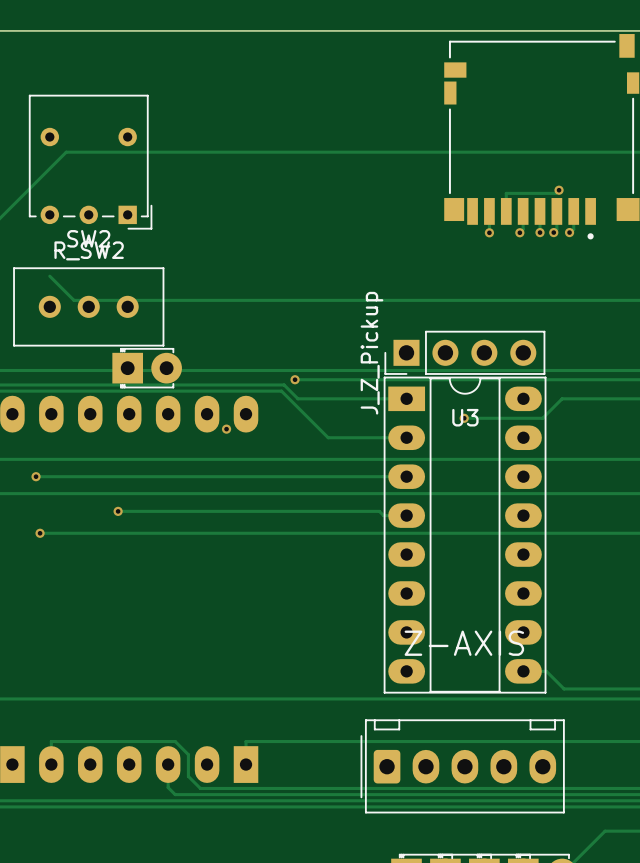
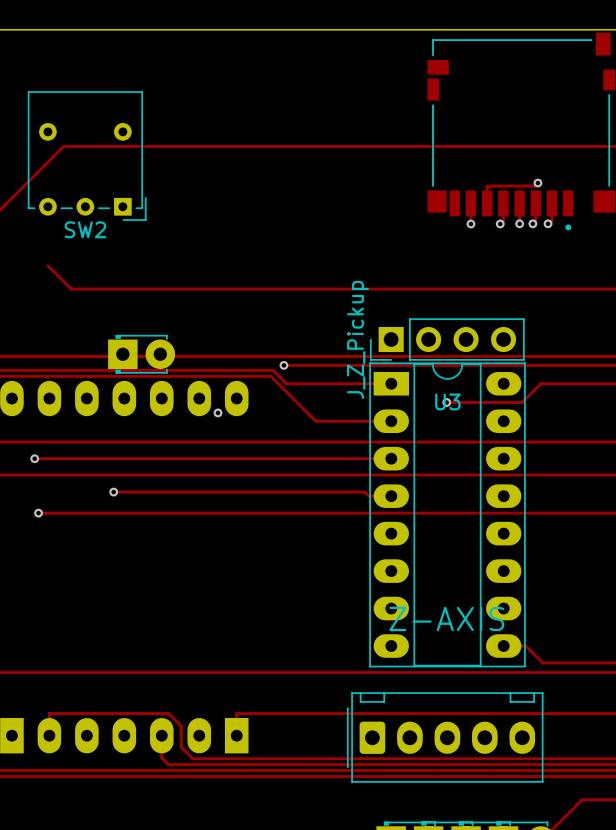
R_SW2: (88, 306) -> none

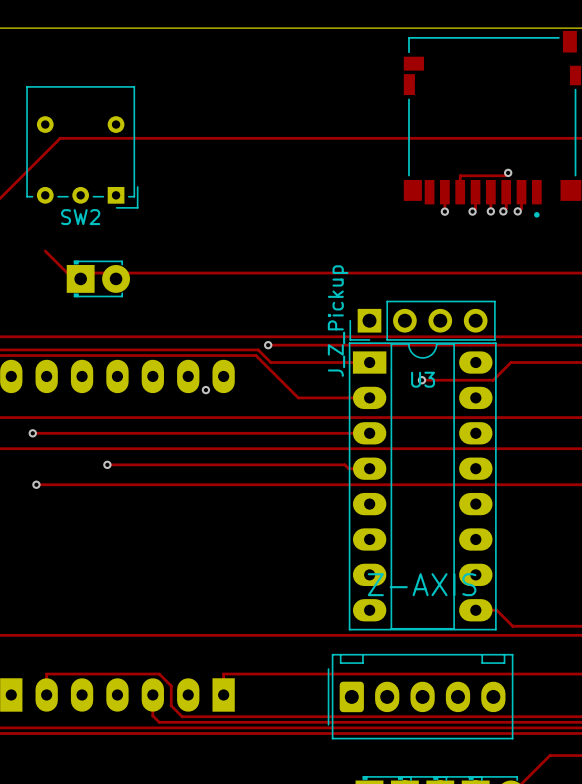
part position: (141, 354) -> (98, 278)

